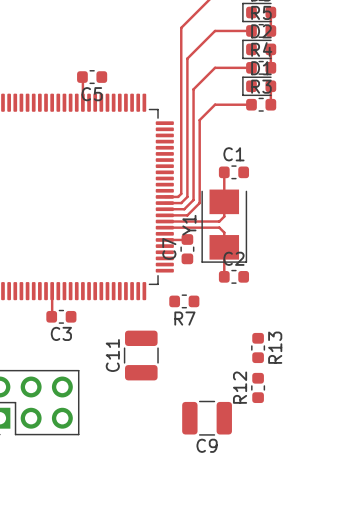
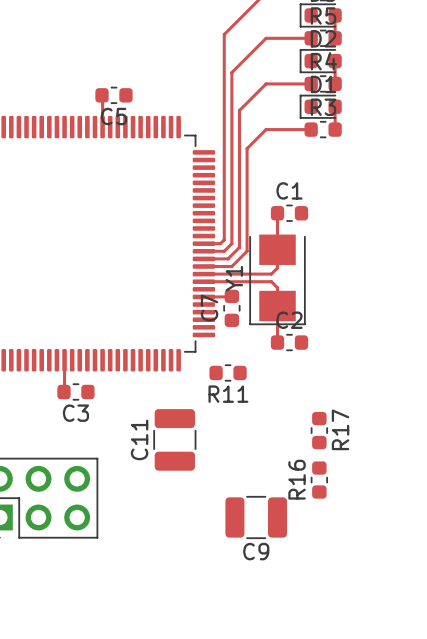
R7 name: R7 (184, 318) -> R11 (228, 394)
R13 name: R13 (275, 347) -> R17 (340, 429)
R12 name: R12 (240, 387) -> R16 (297, 479)

